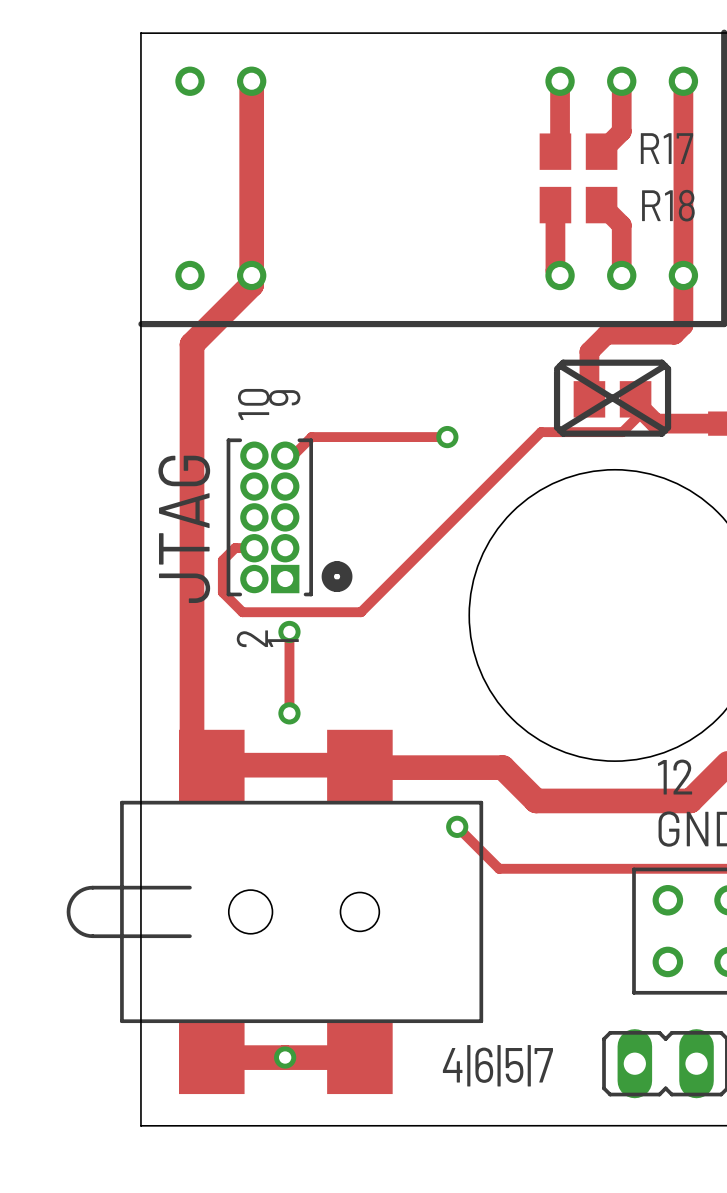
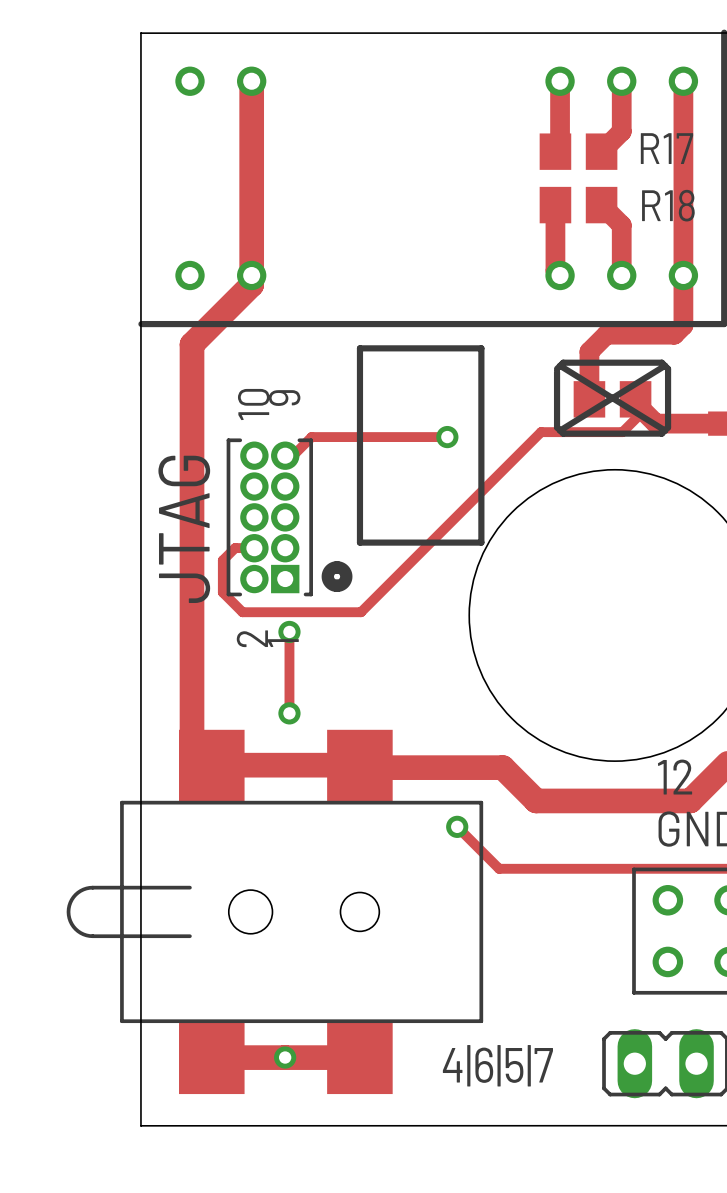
line: none -> (359, 348) (359, 542) (481, 542) (481, 348) (359, 348)

